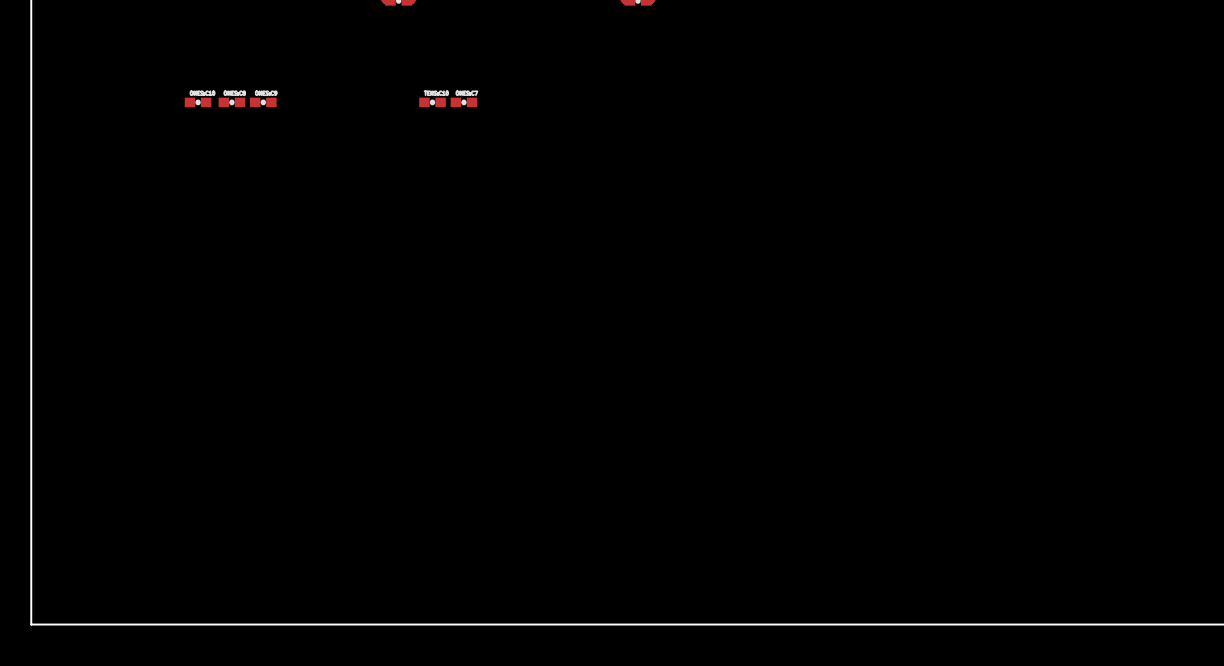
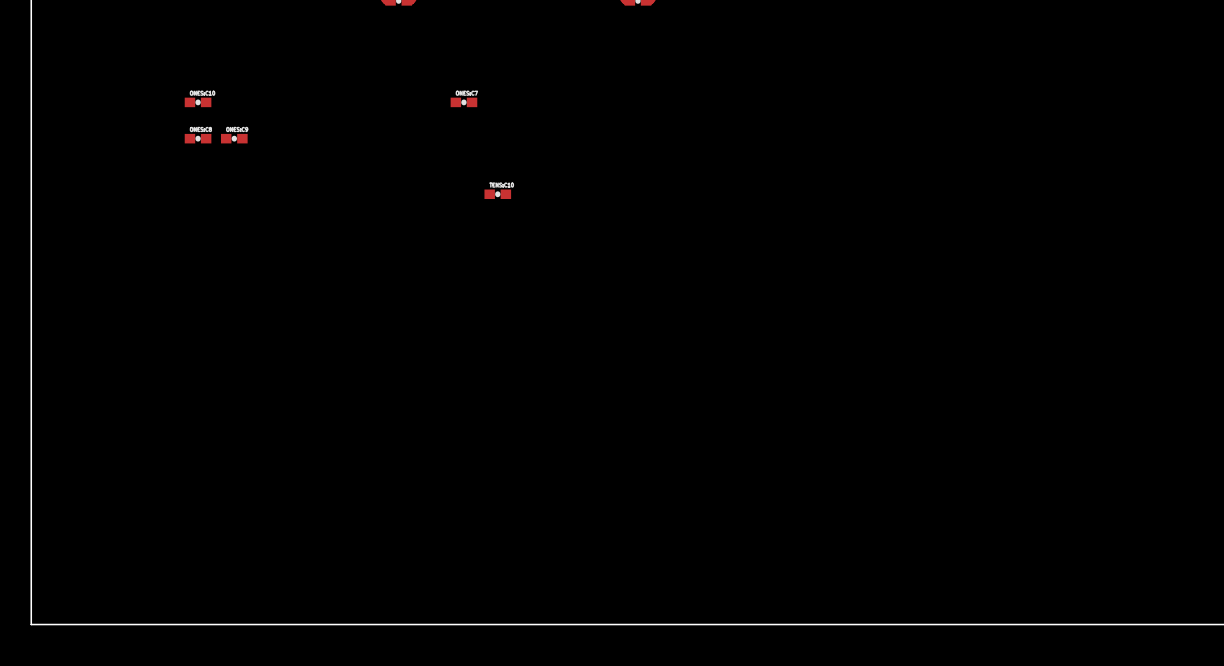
part position: (231, 102) -> (198, 138)
part position: (263, 102) -> (234, 138)
part position: (432, 102) -> (497, 194)

